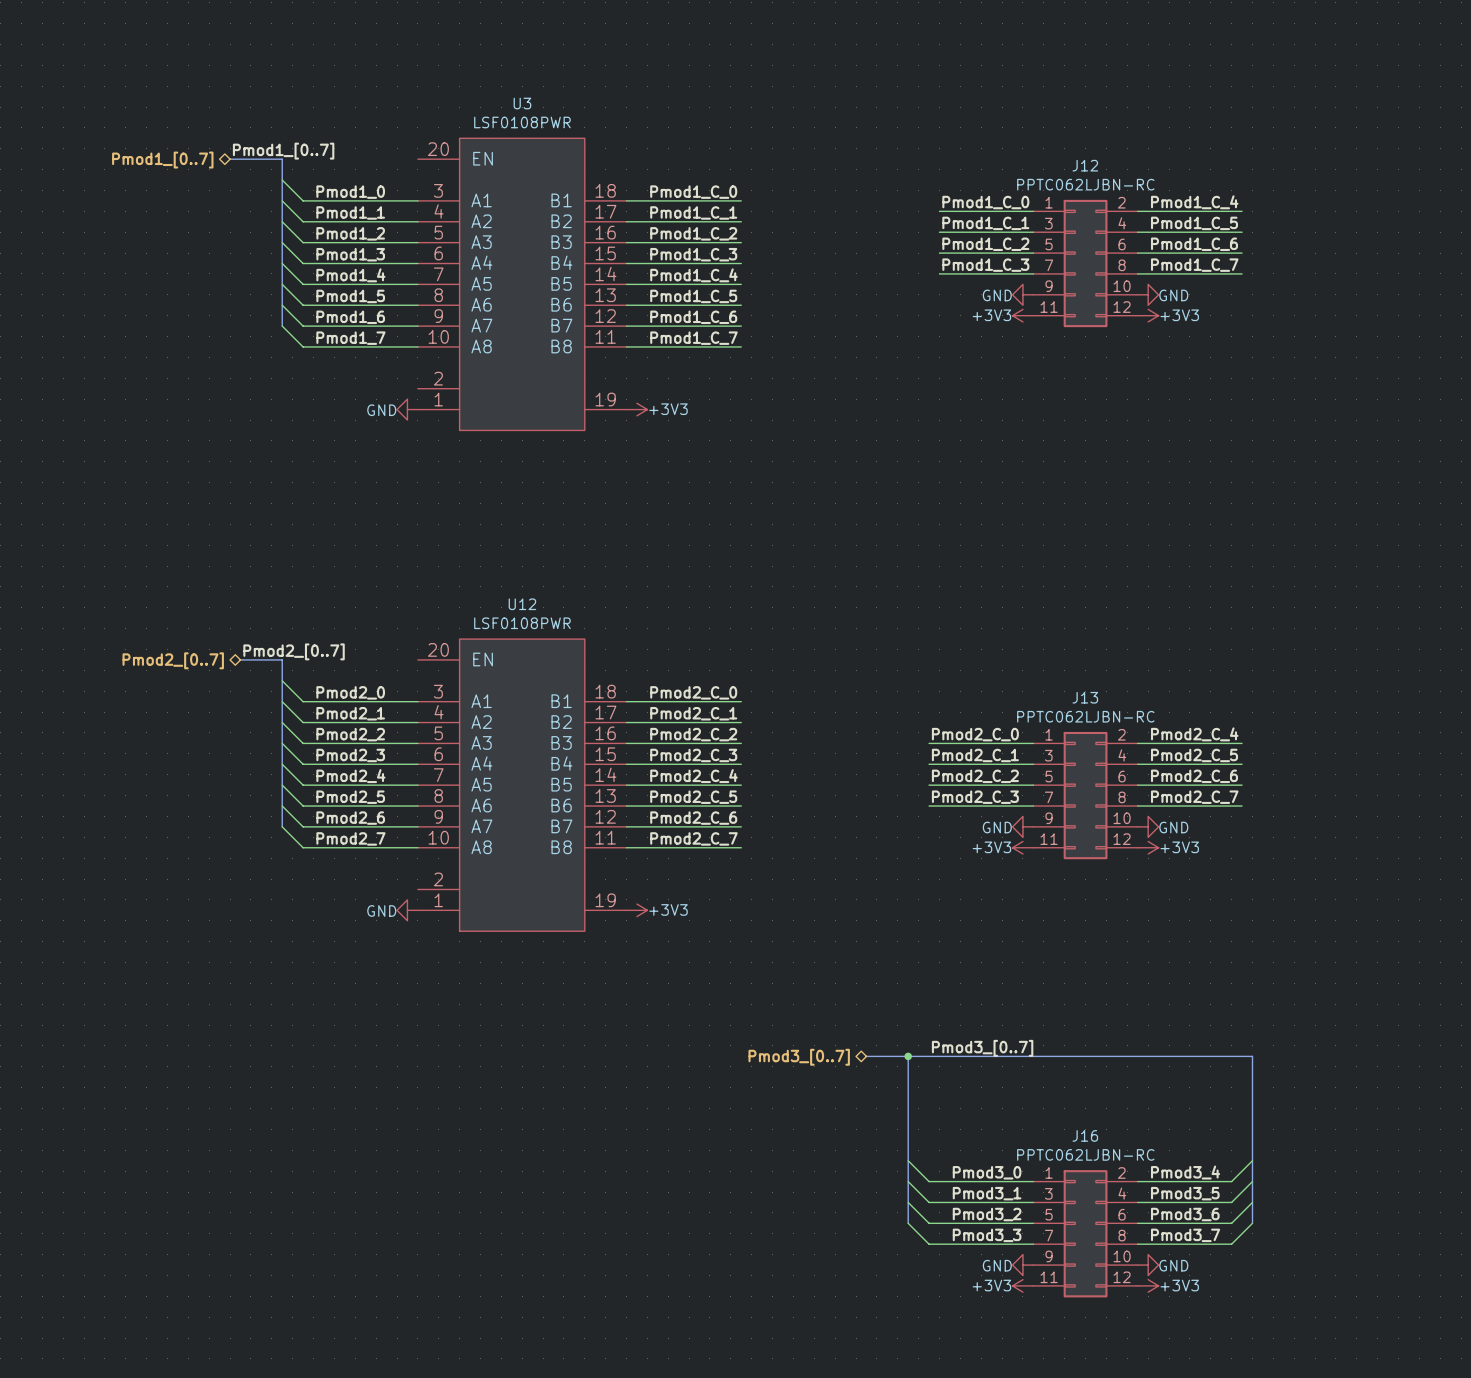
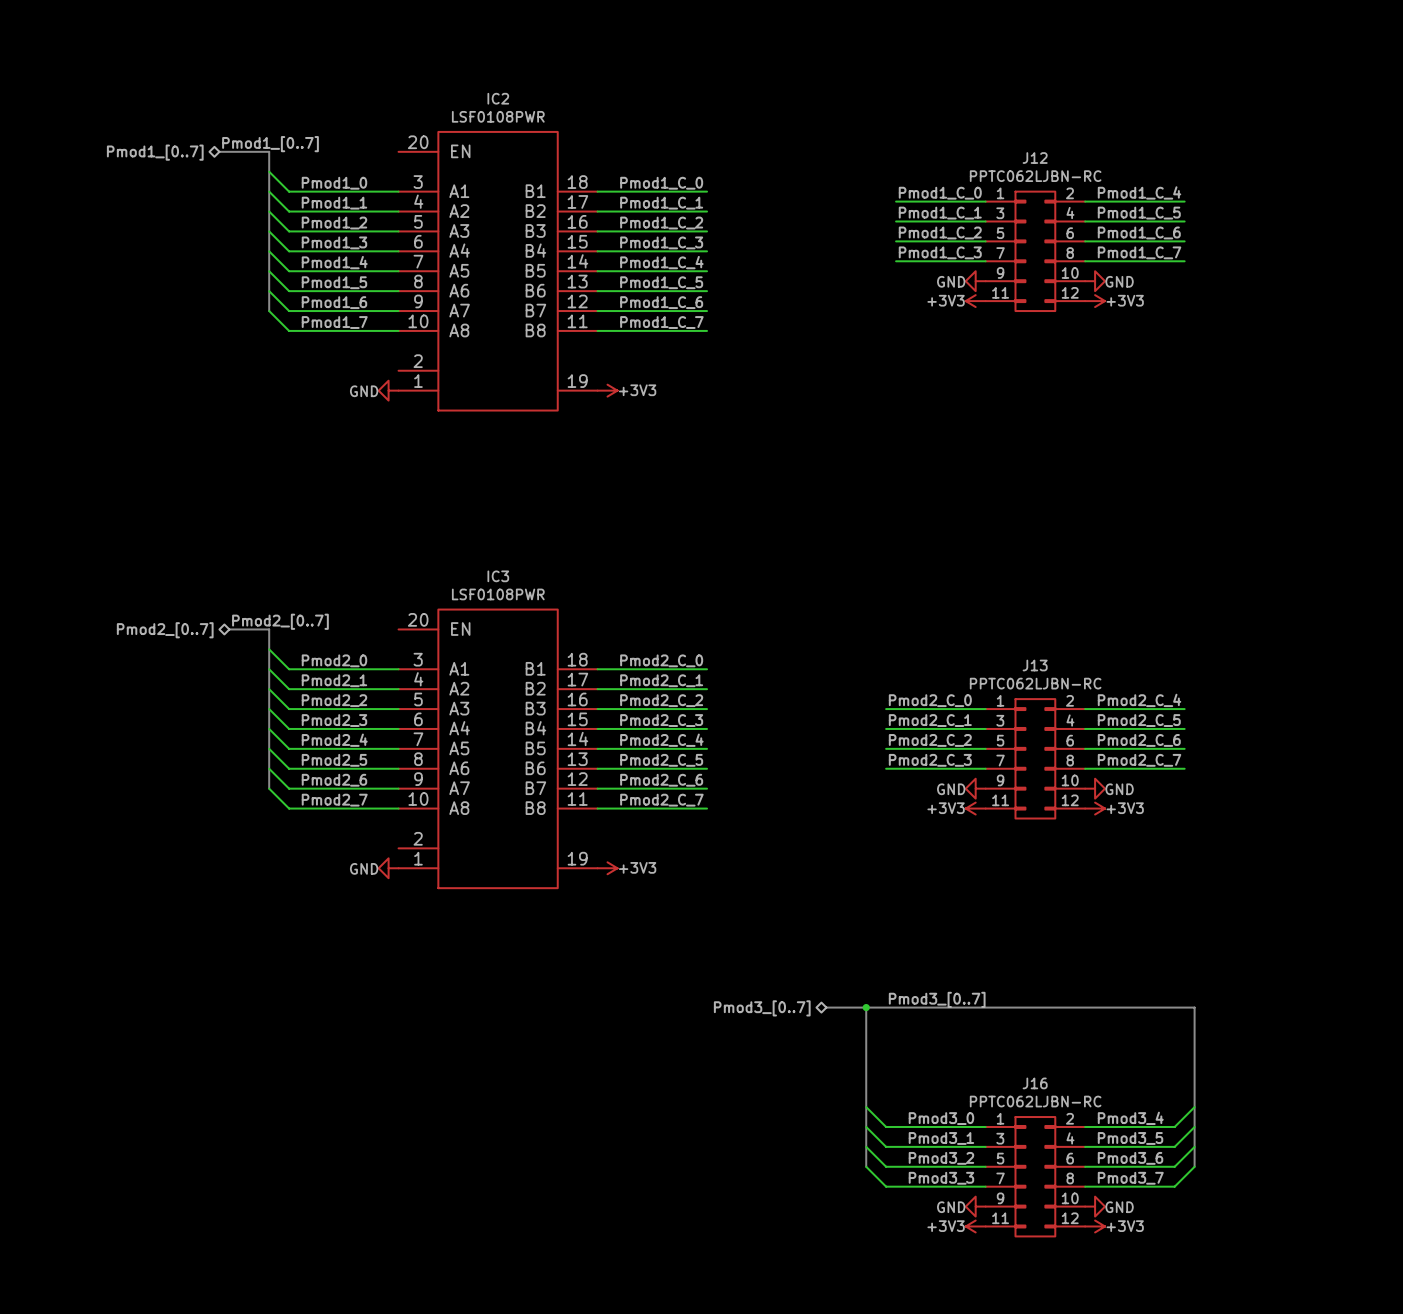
U3 name: U3 (522, 103) -> IC2 (498, 98)
U12 name: U12 (522, 604) -> IC3 (498, 576)

